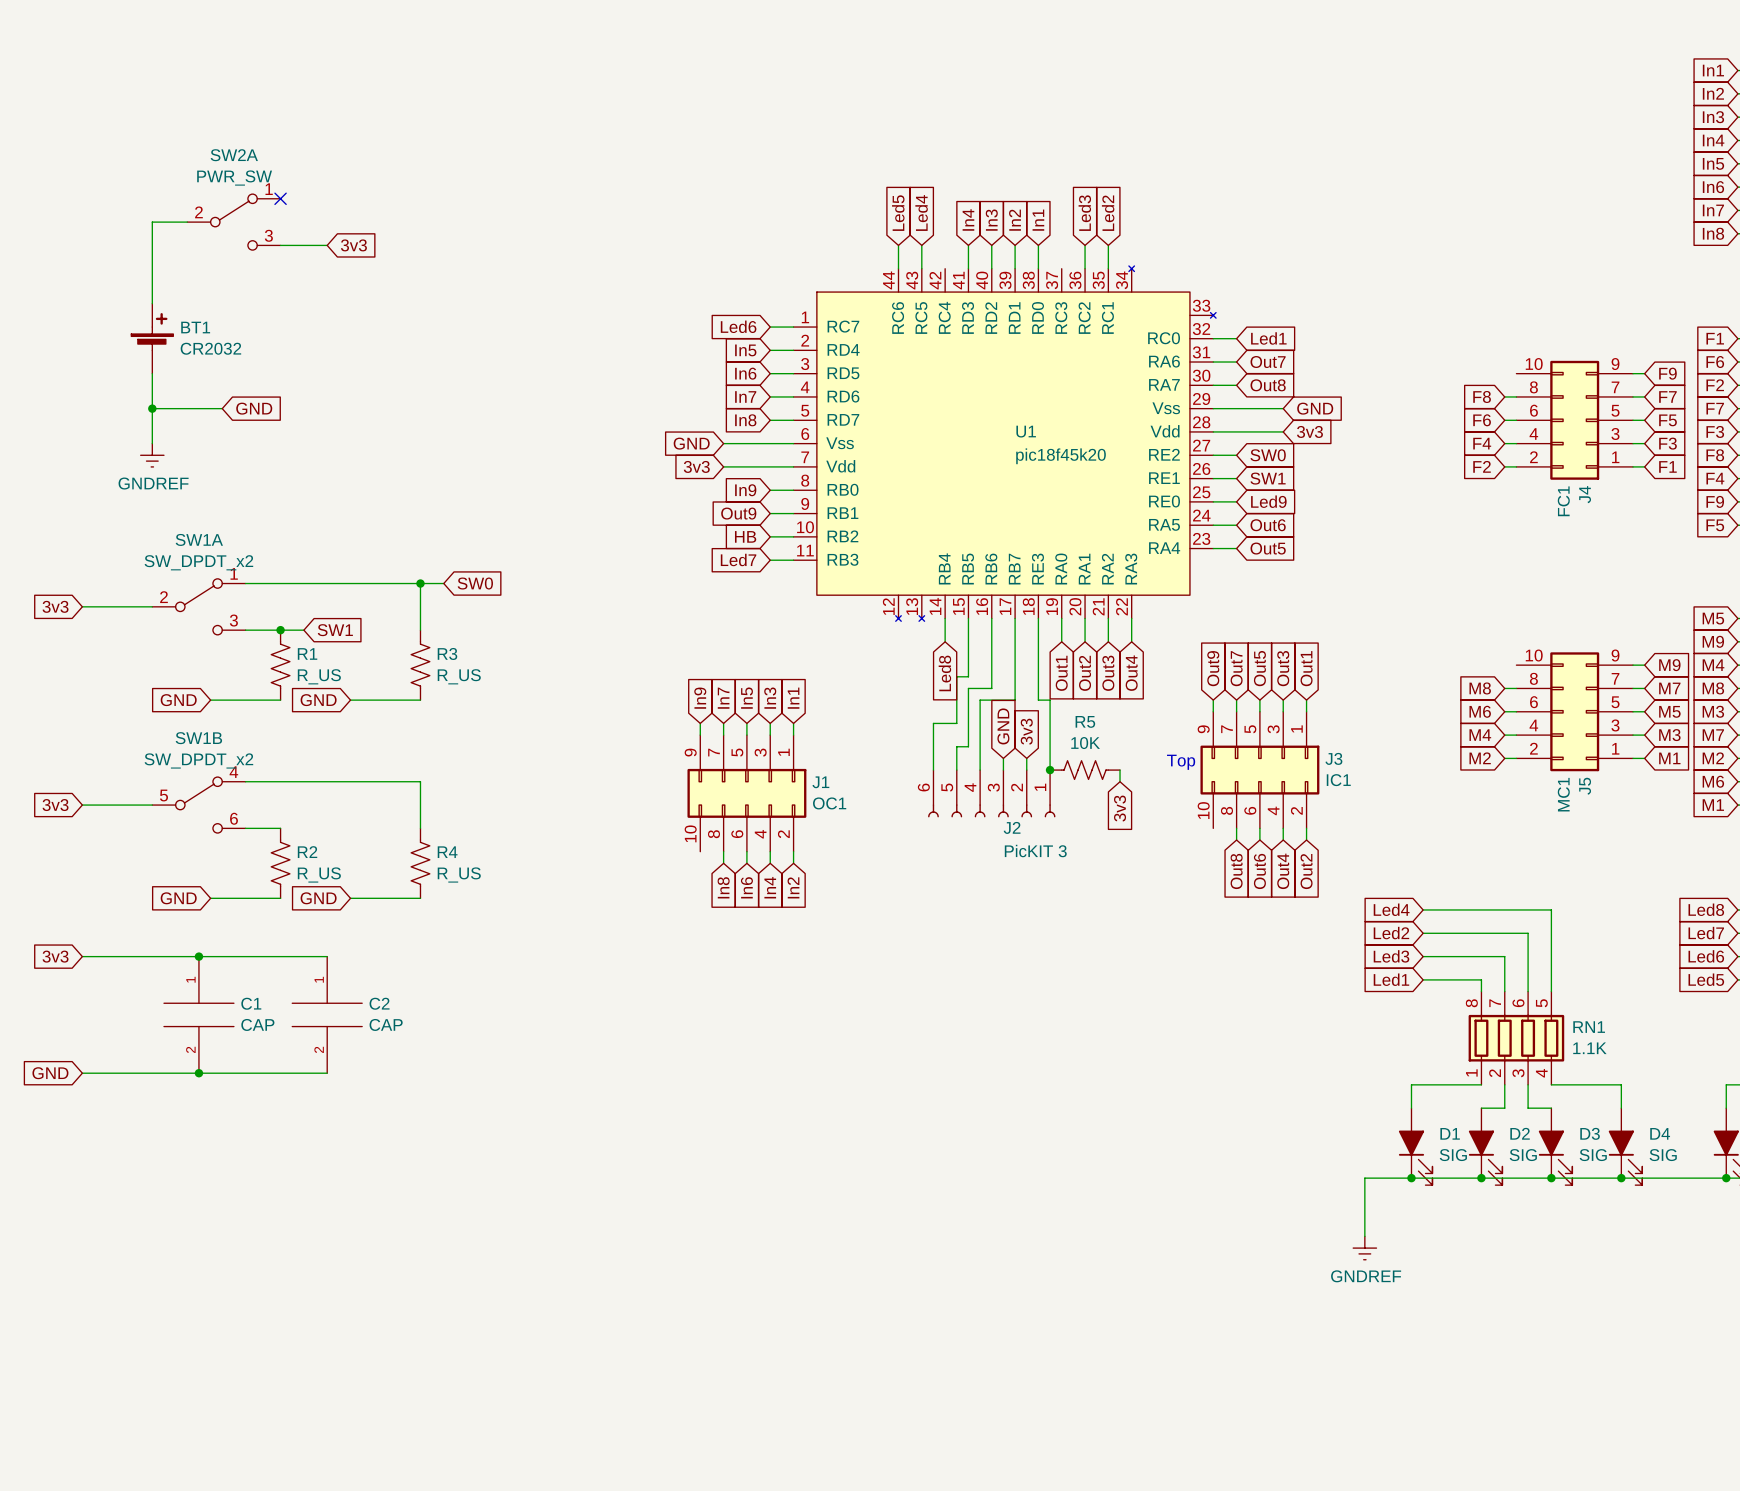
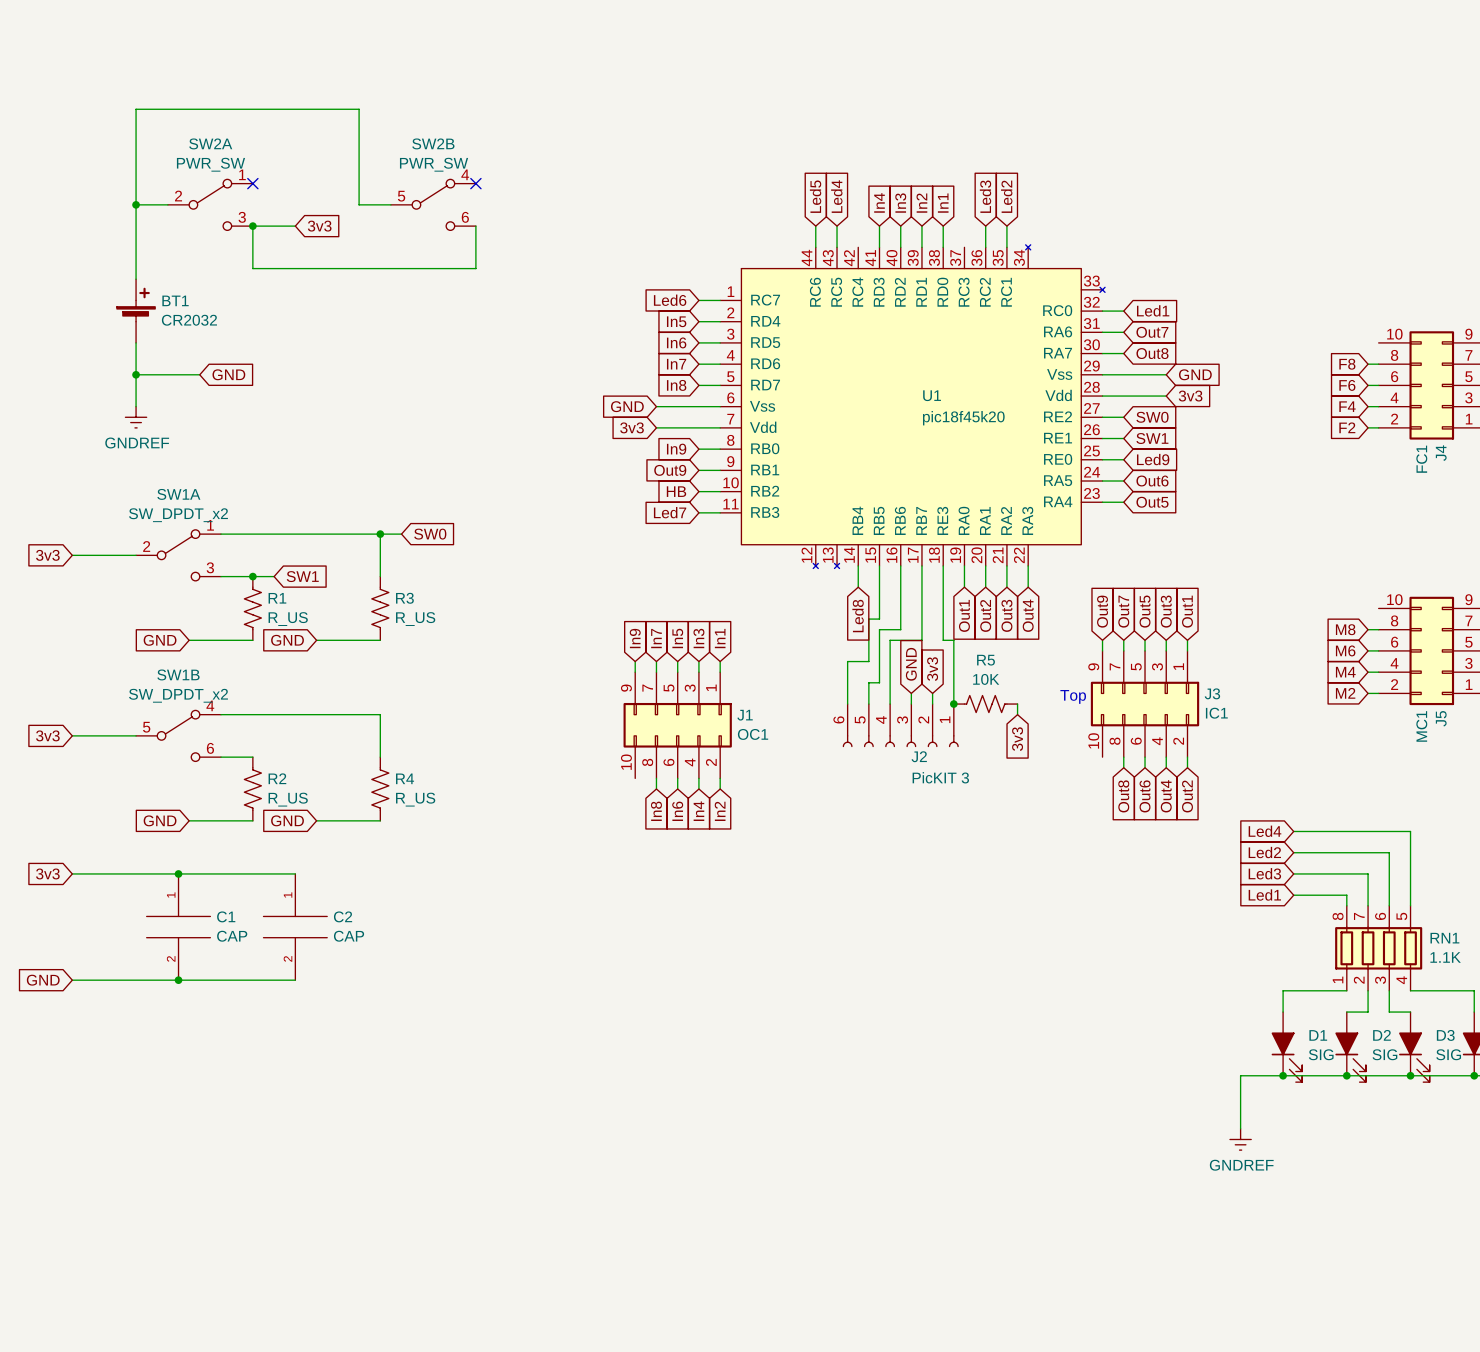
no-connect mark: none -> (475, 183)
wire: none -> (136, 204) (136, 109) (359, 109) (359, 204) (390, 204)
junction: none -> (136, 204)
SW2B: none -> PWR_SW (433, 204)
wire: none -> (252, 226) (252, 268) (475, 268) (475, 226)
junction: none -> (252, 226)

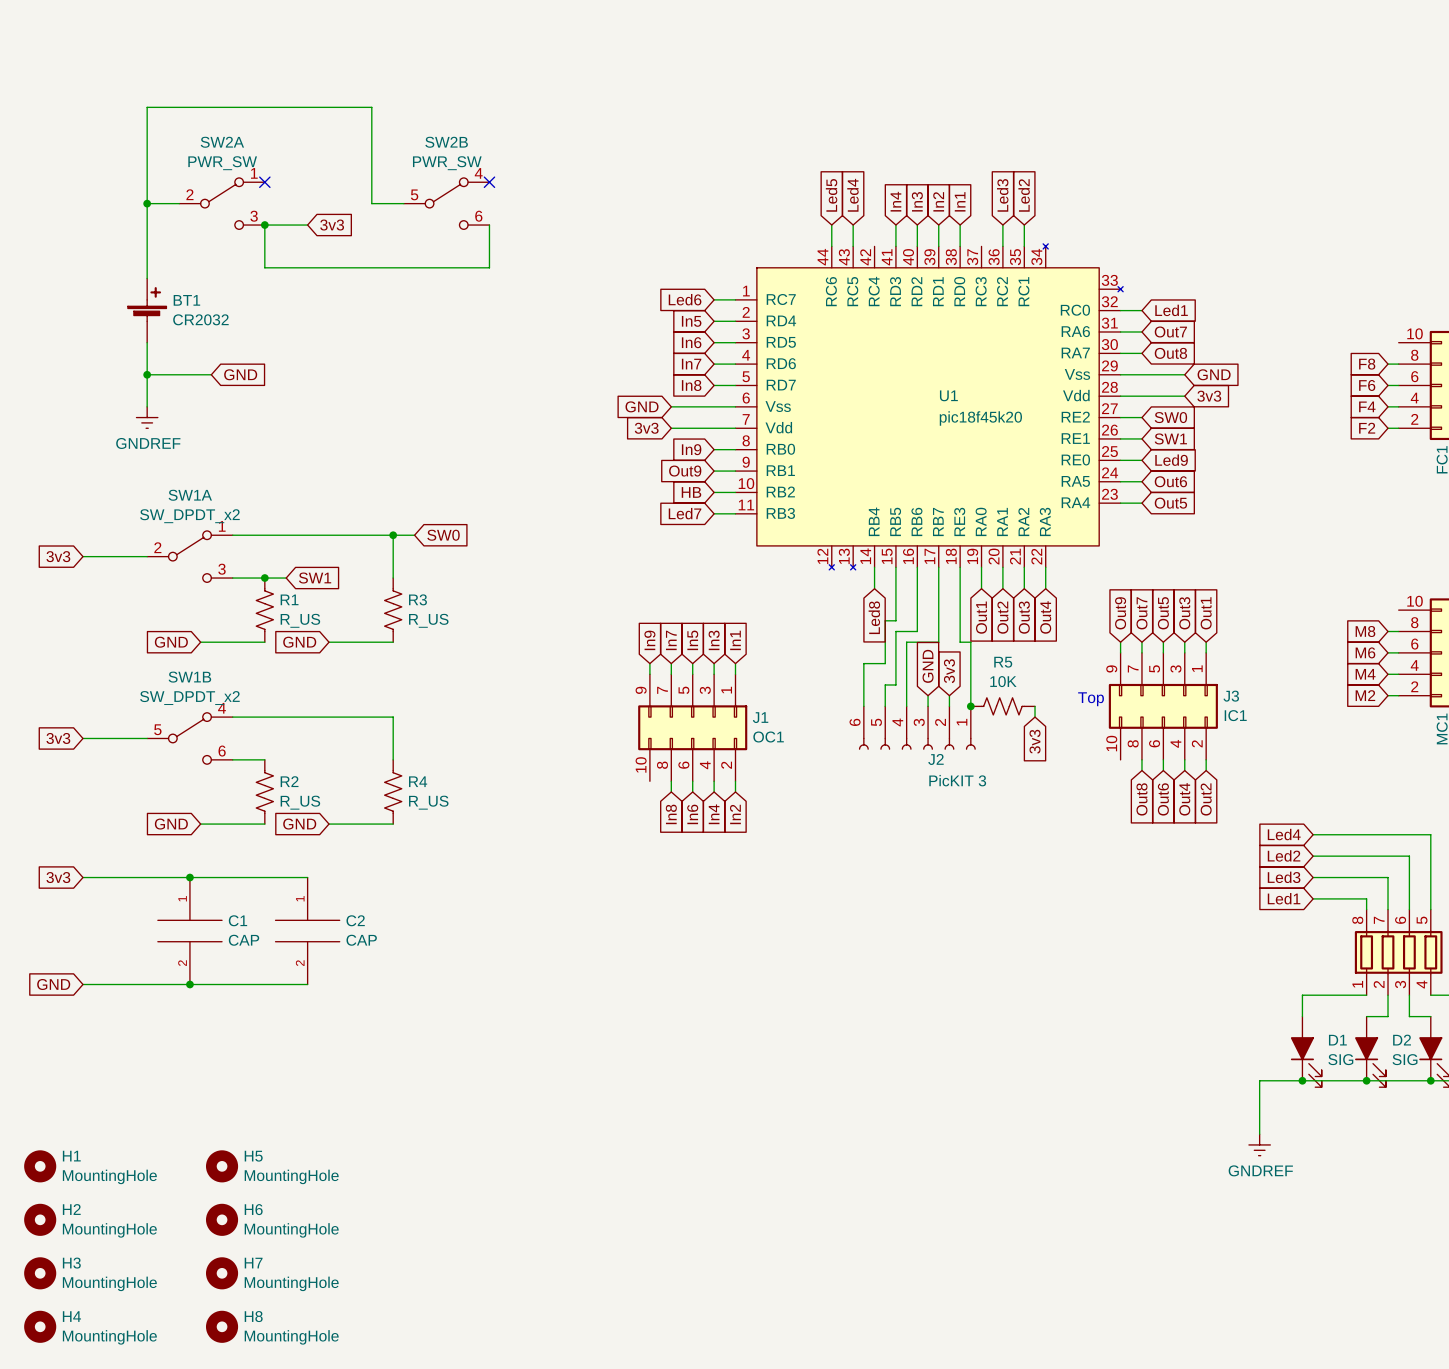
H1: none -> MountingHole (40, 1166)
H5: none -> MountingHole (222, 1166)
H2: none -> MountingHole (40, 1219)
H6: none -> MountingHole (222, 1219)
H3: none -> MountingHole (40, 1273)
H7: none -> MountingHole (222, 1273)
H4: none -> MountingHole (40, 1326)
H8: none -> MountingHole (222, 1326)

